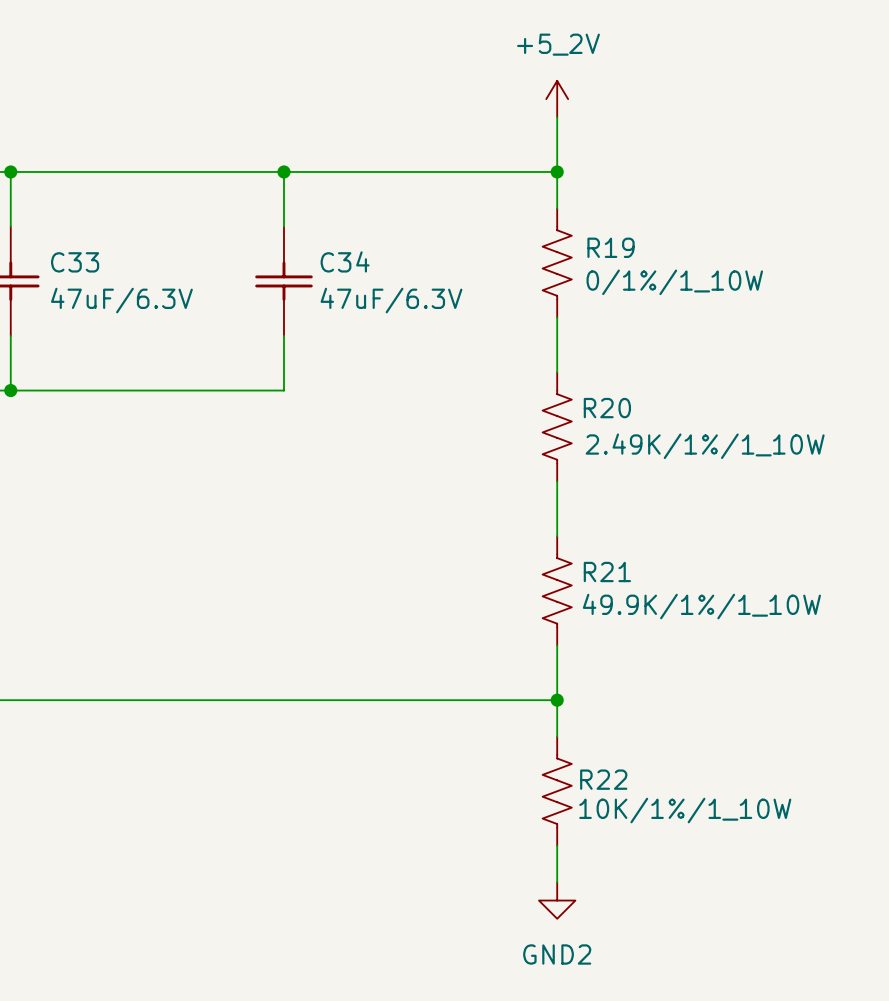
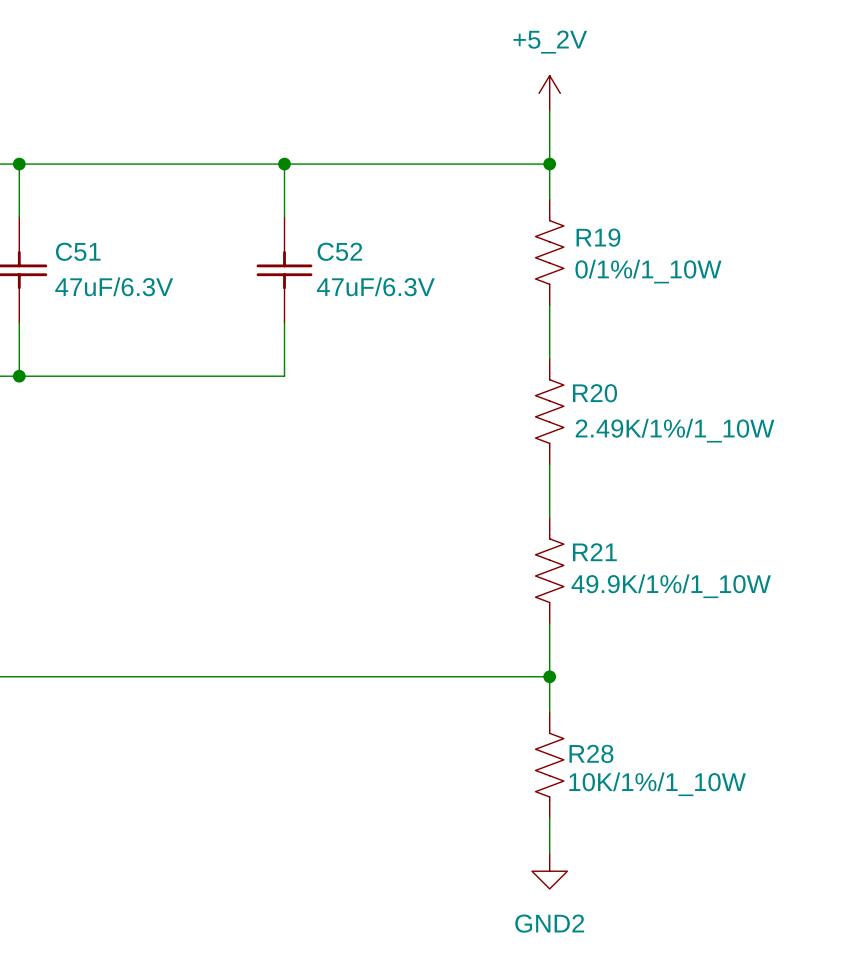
C34 name: C34 (345, 261) -> C52 (339, 251)
C33 name: C33 (75, 262) -> C51 (78, 251)
R22 name: R22 (603, 779) -> R28 (591, 753)

